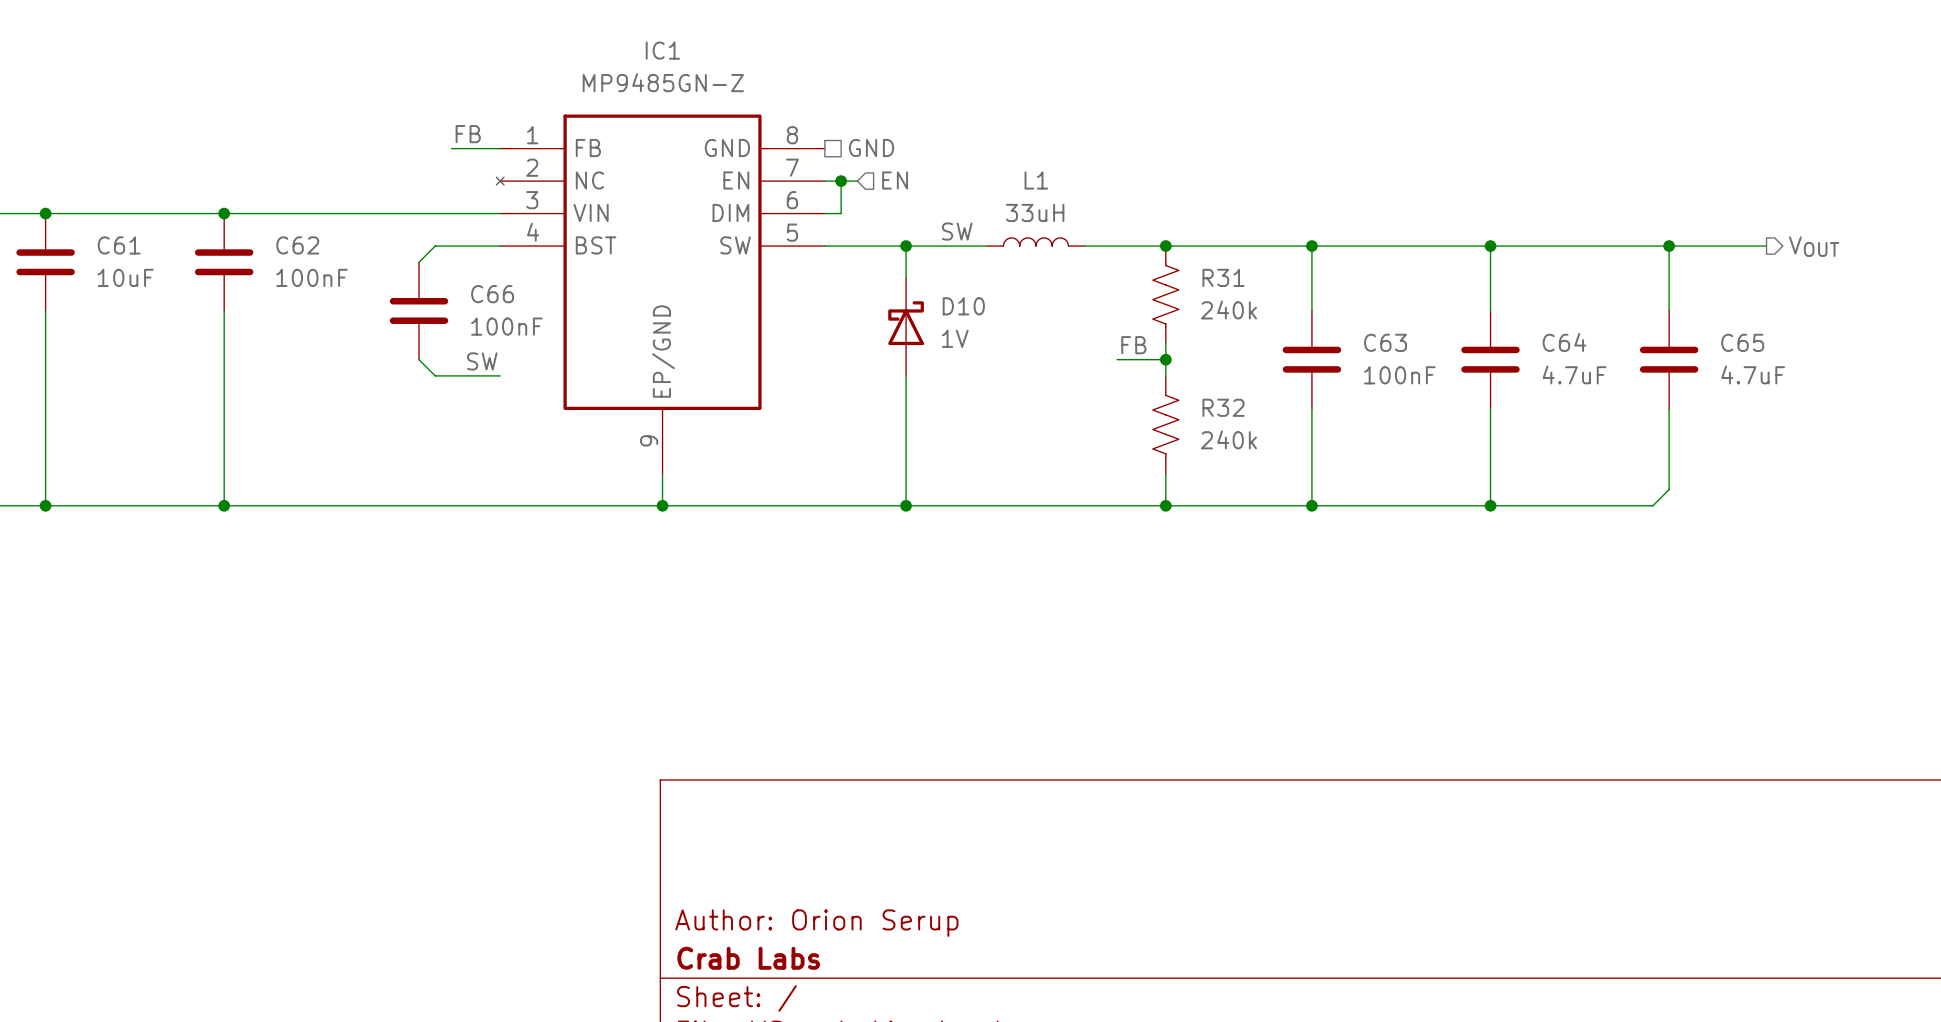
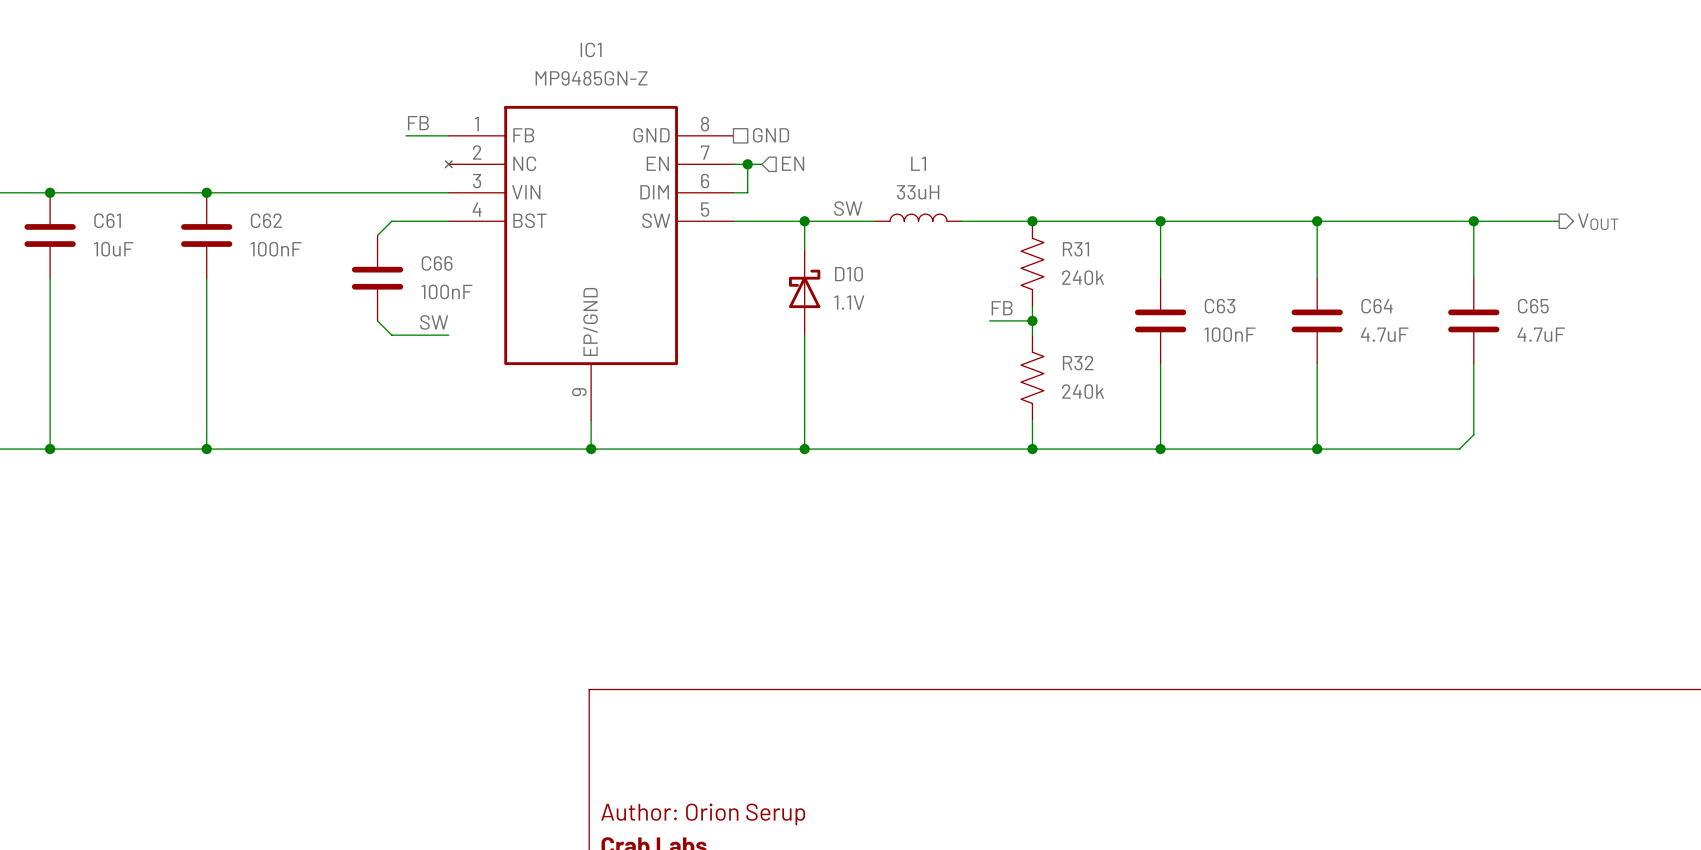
D10 value: 1V (955, 338) -> 1.1V (849, 302)

